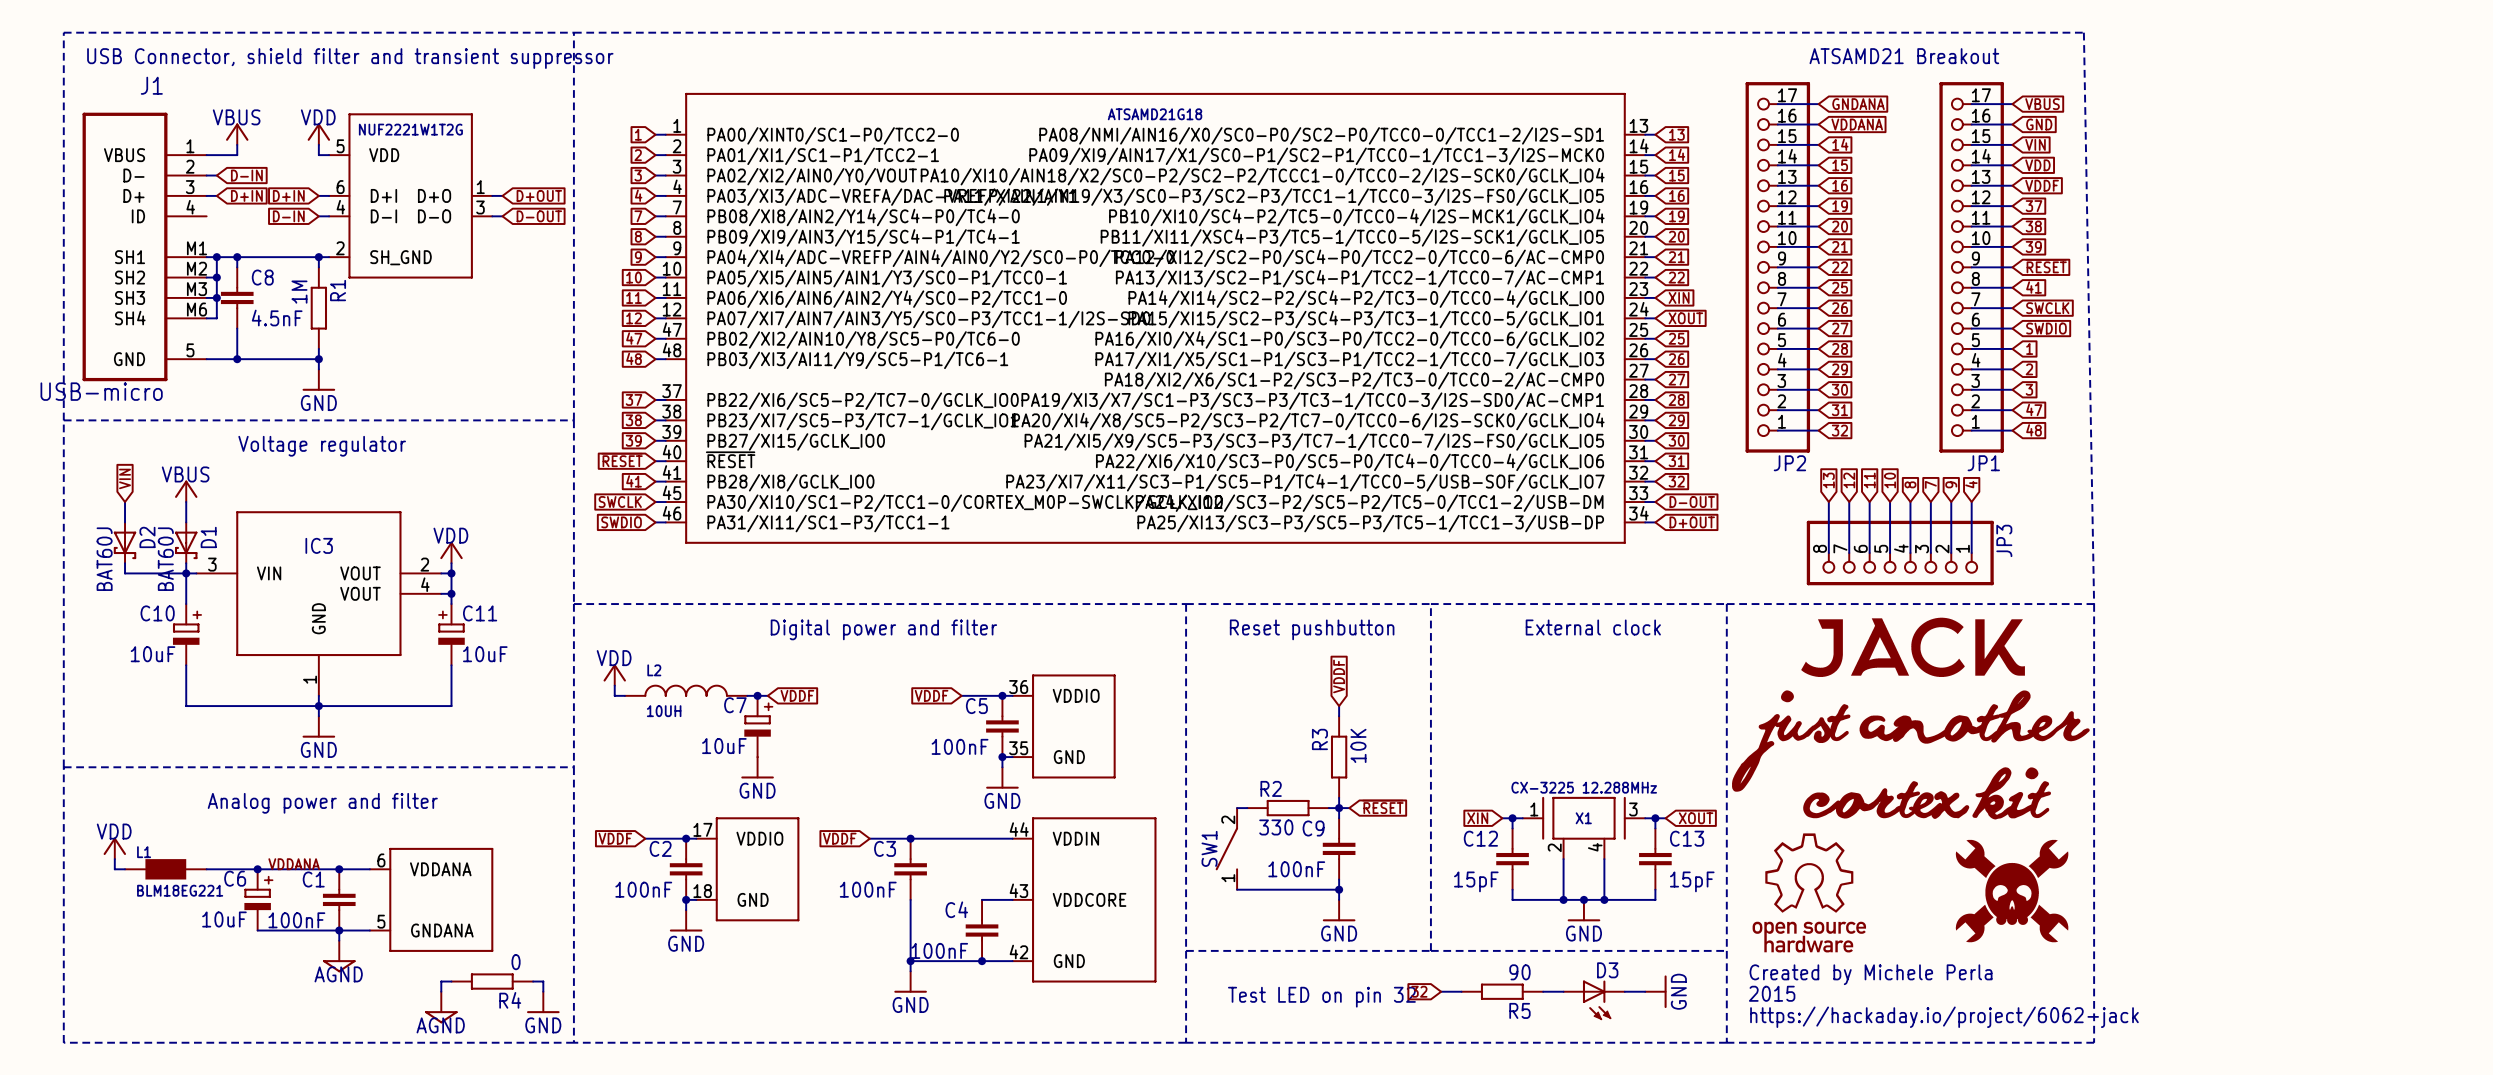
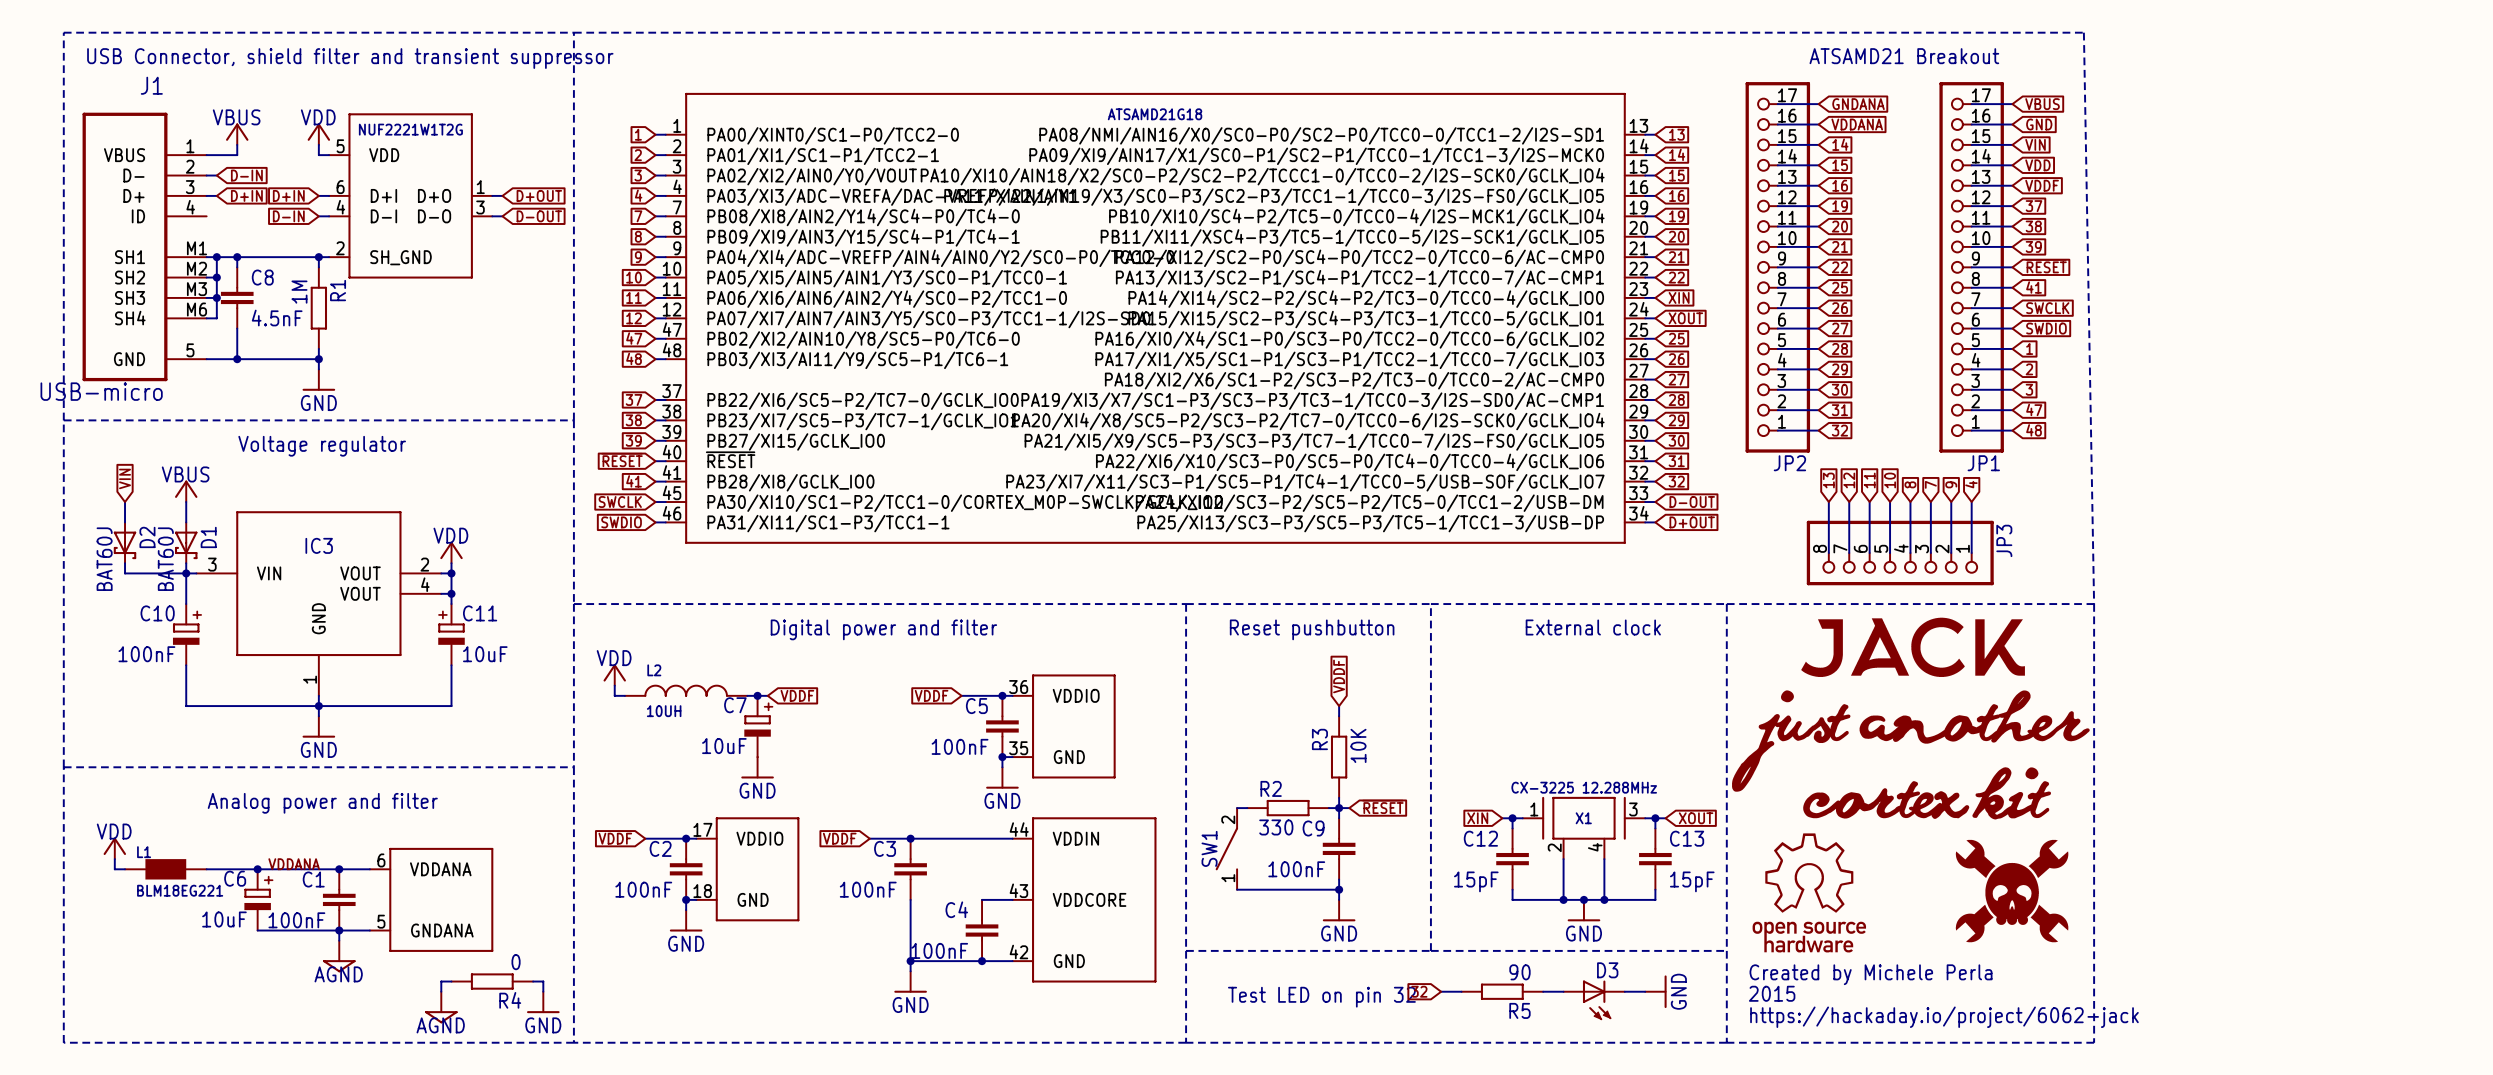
C10 value: 10uF (153, 654) -> 100nF (146, 654)

